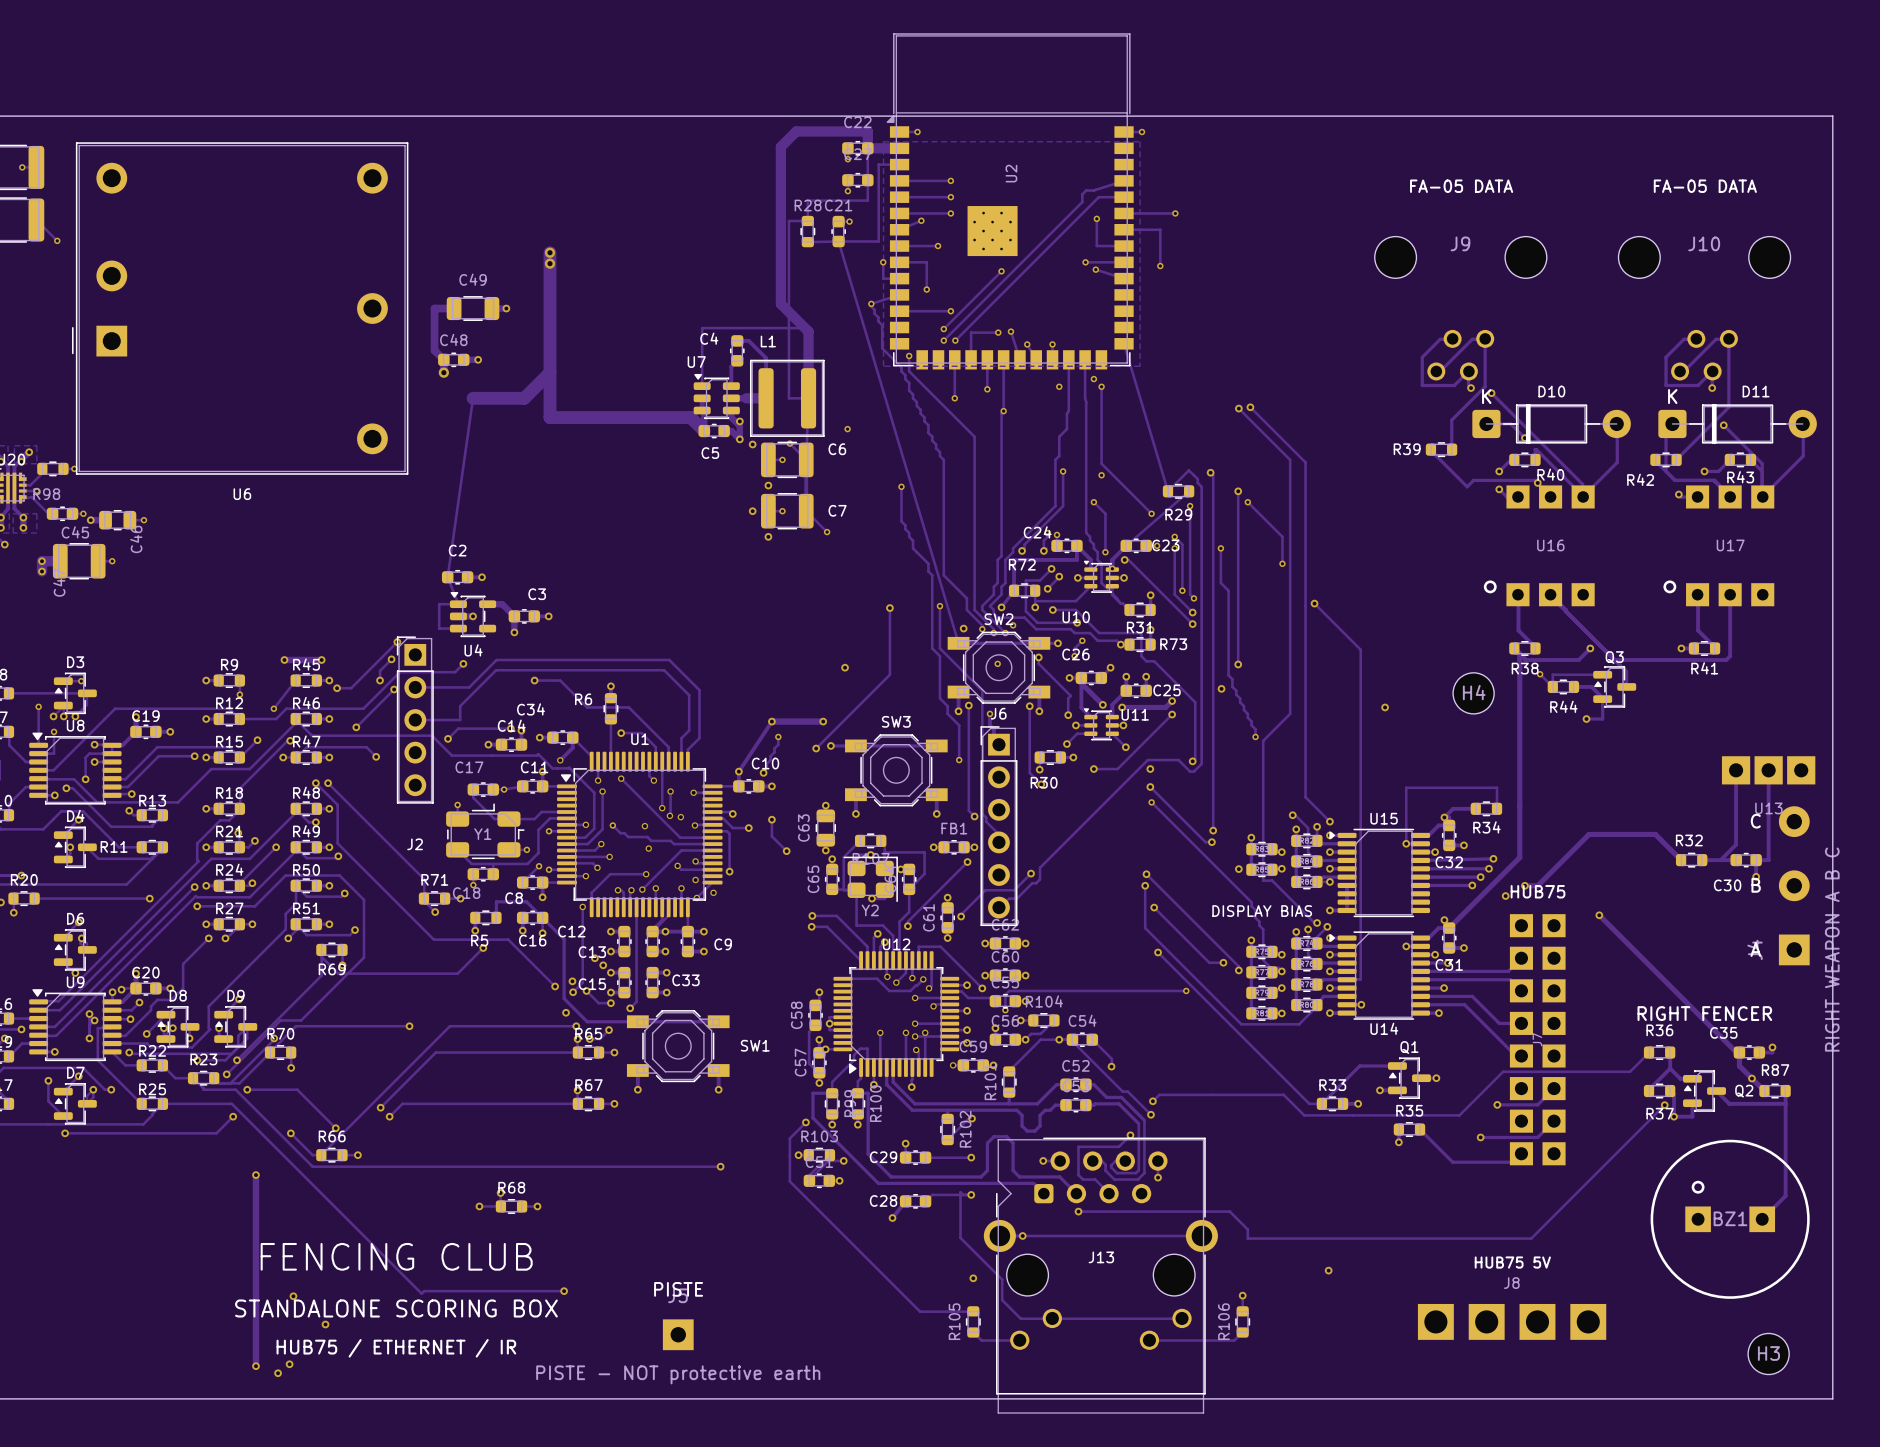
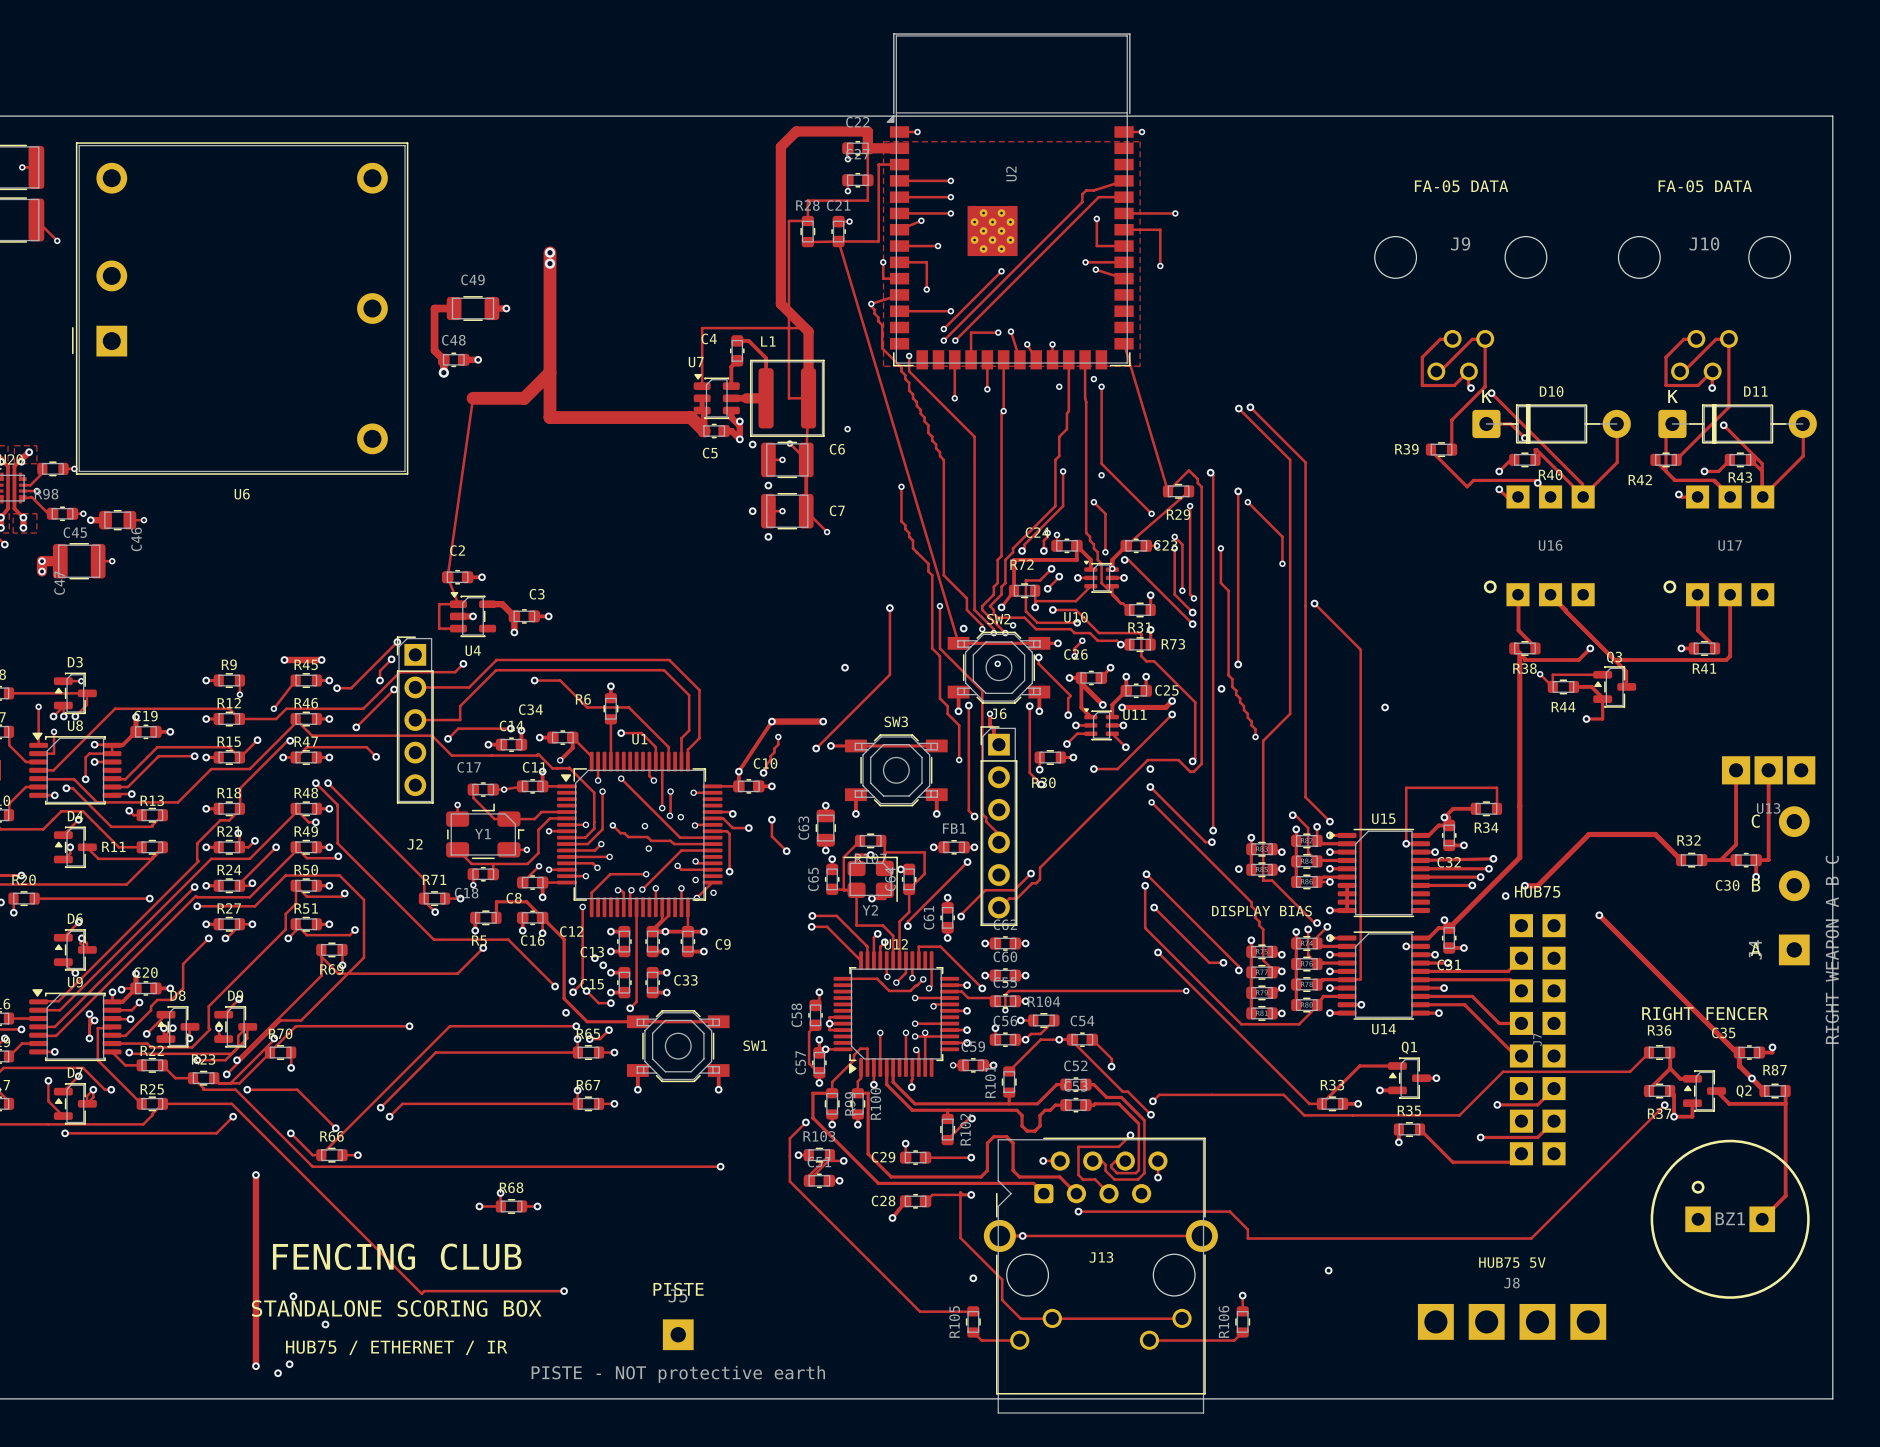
H4: (1473, 693) -> none
H3: (1768, 1353) -> none

